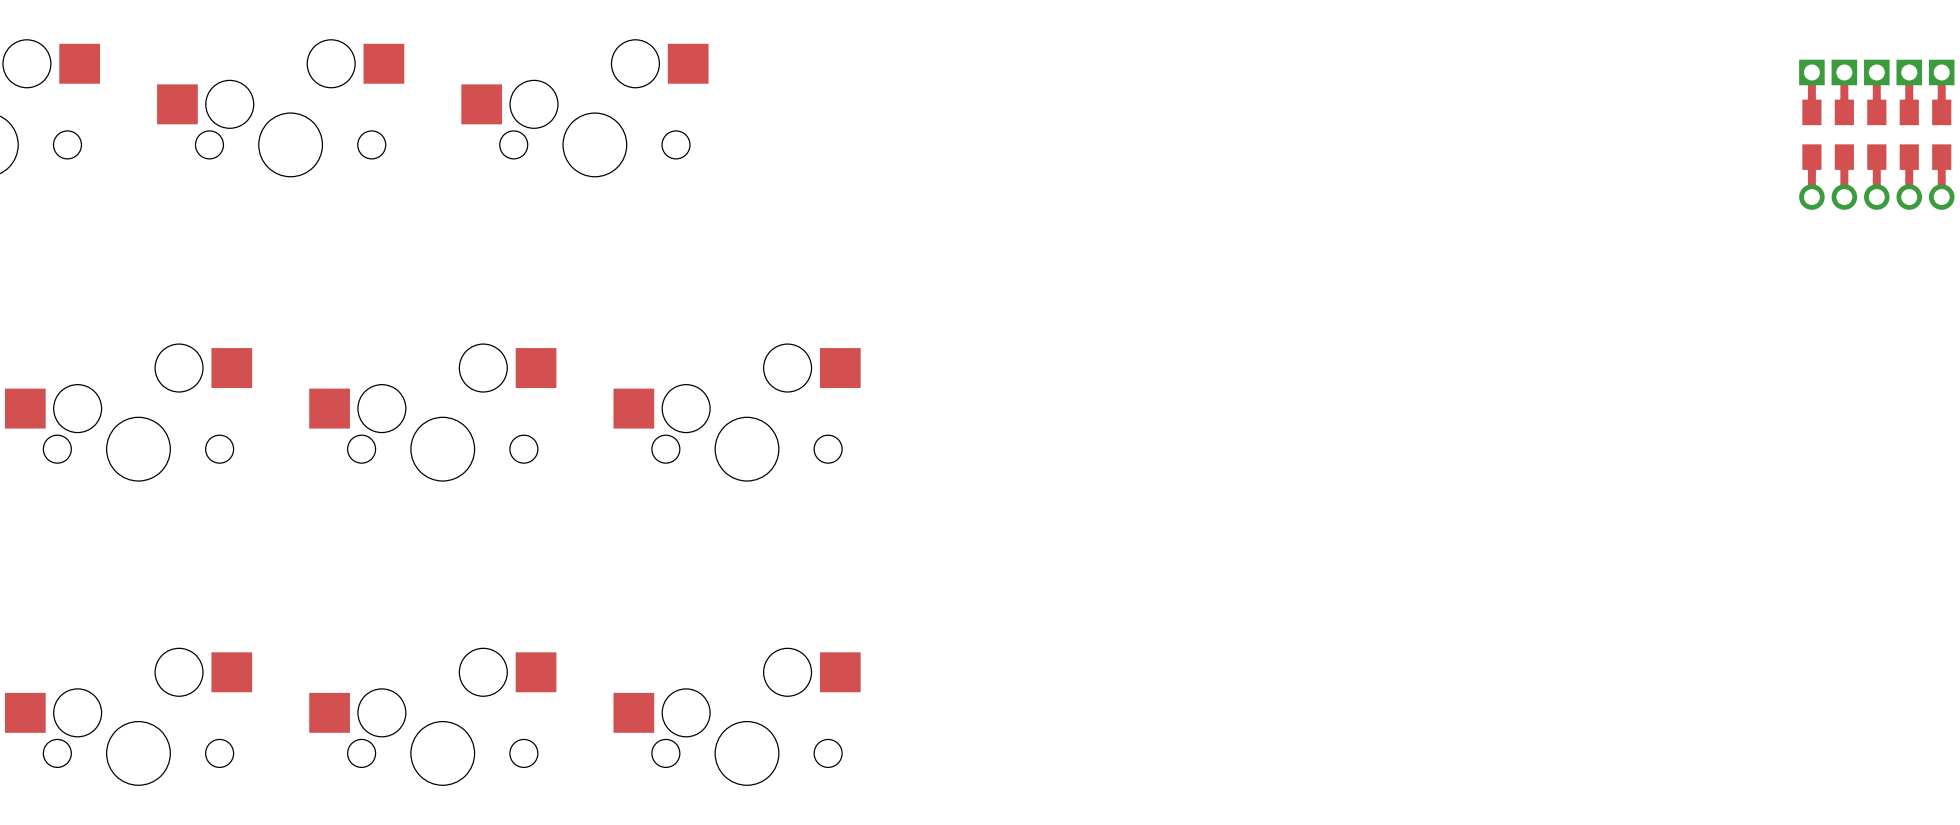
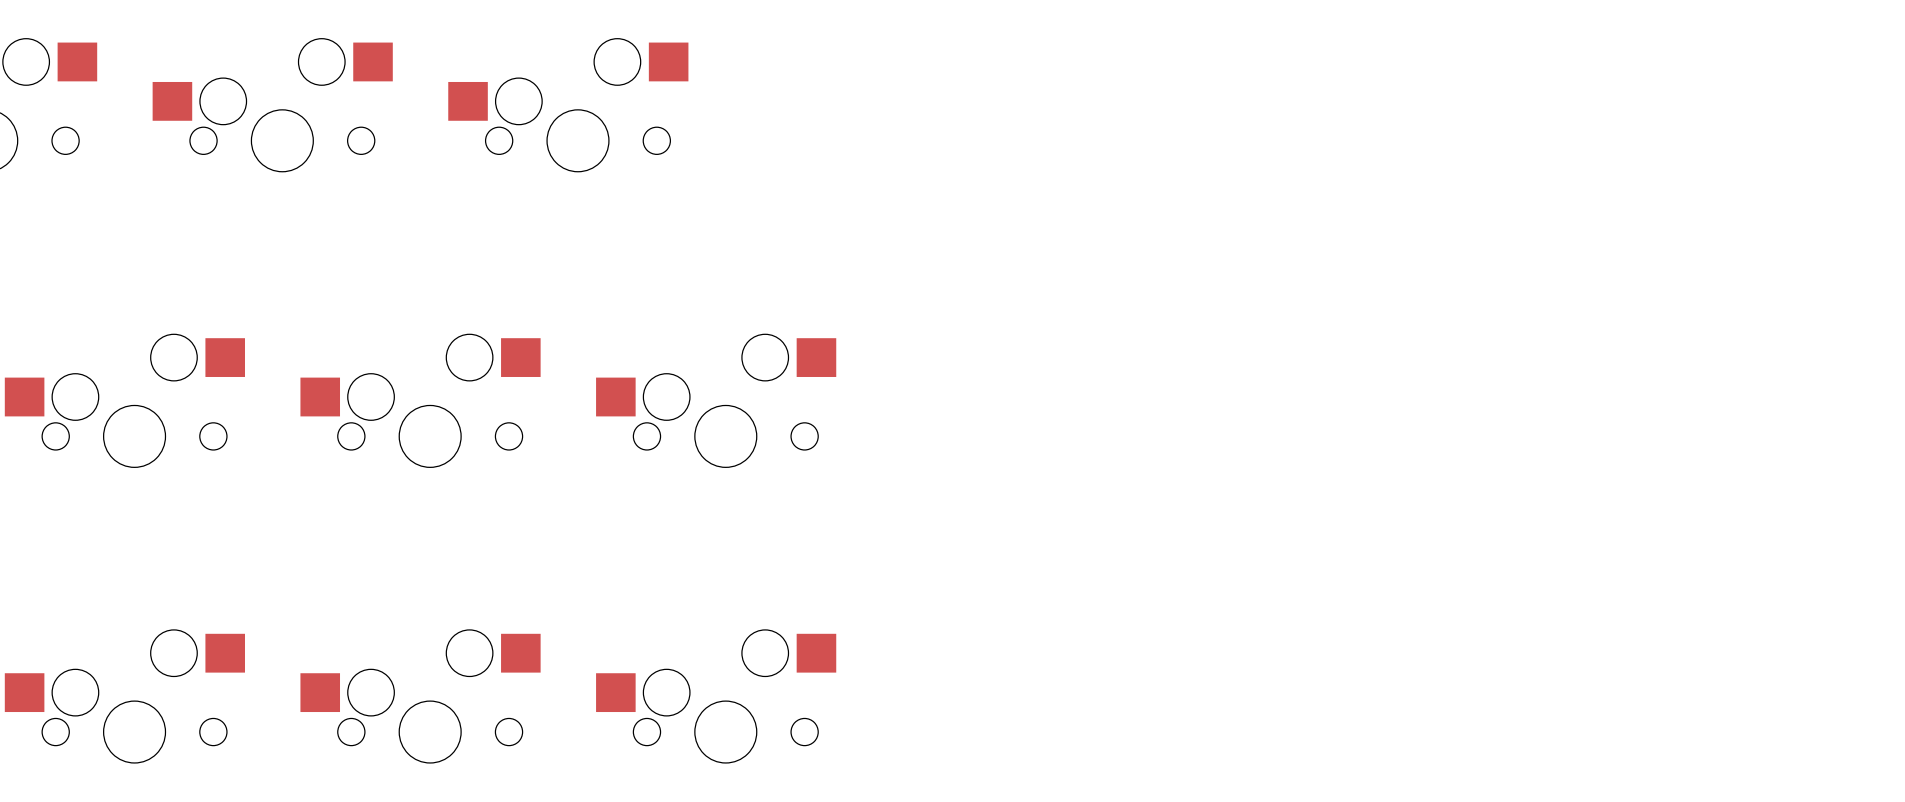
part: (1811, 134) -> none
part: (1844, 134) -> none
part: (1876, 134) -> none
part: (1909, 134) -> none
part: (1941, 134) -> none

